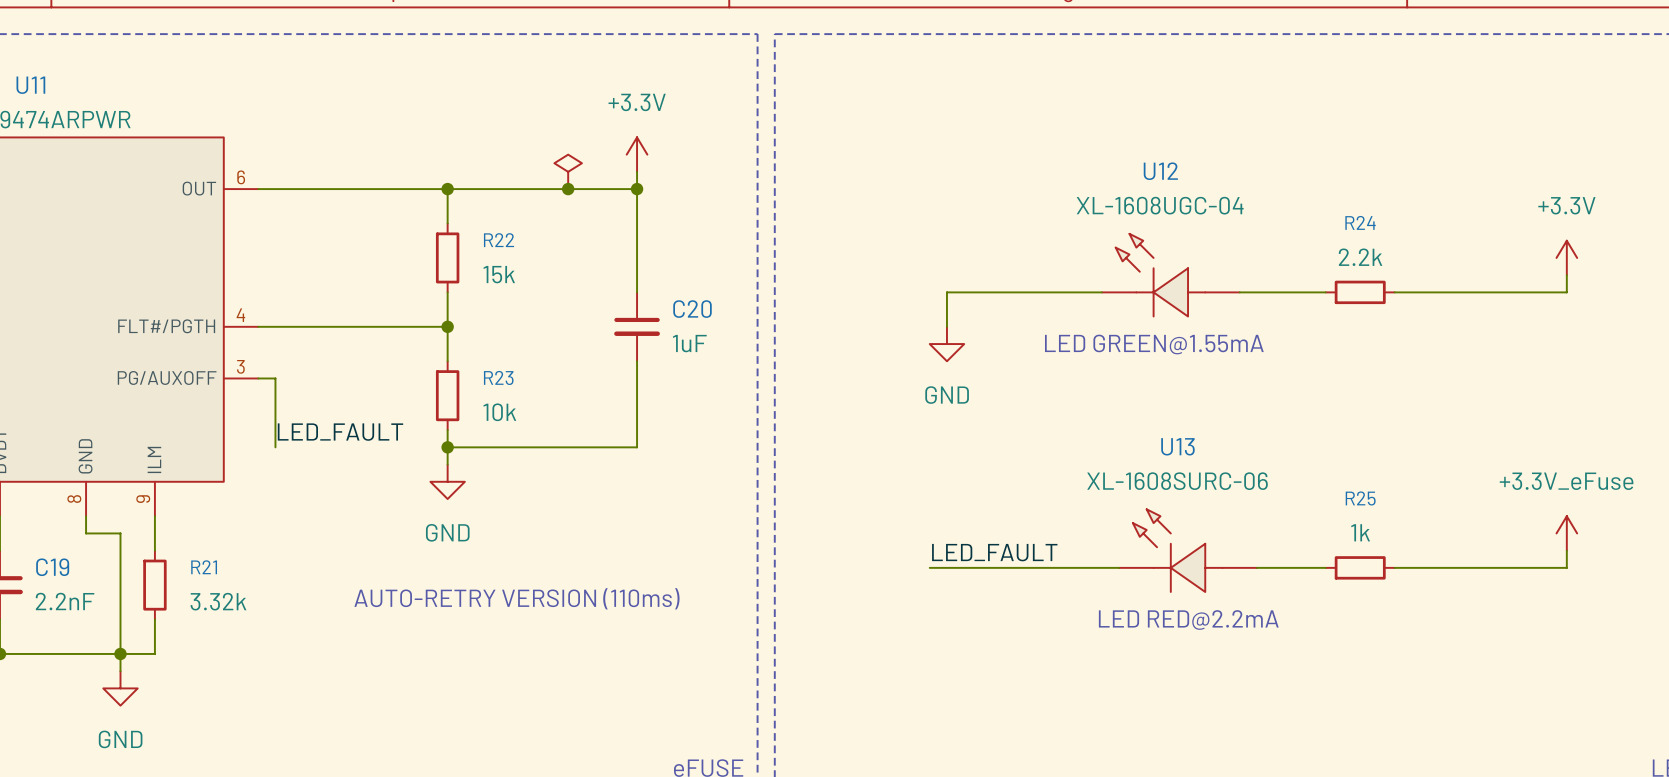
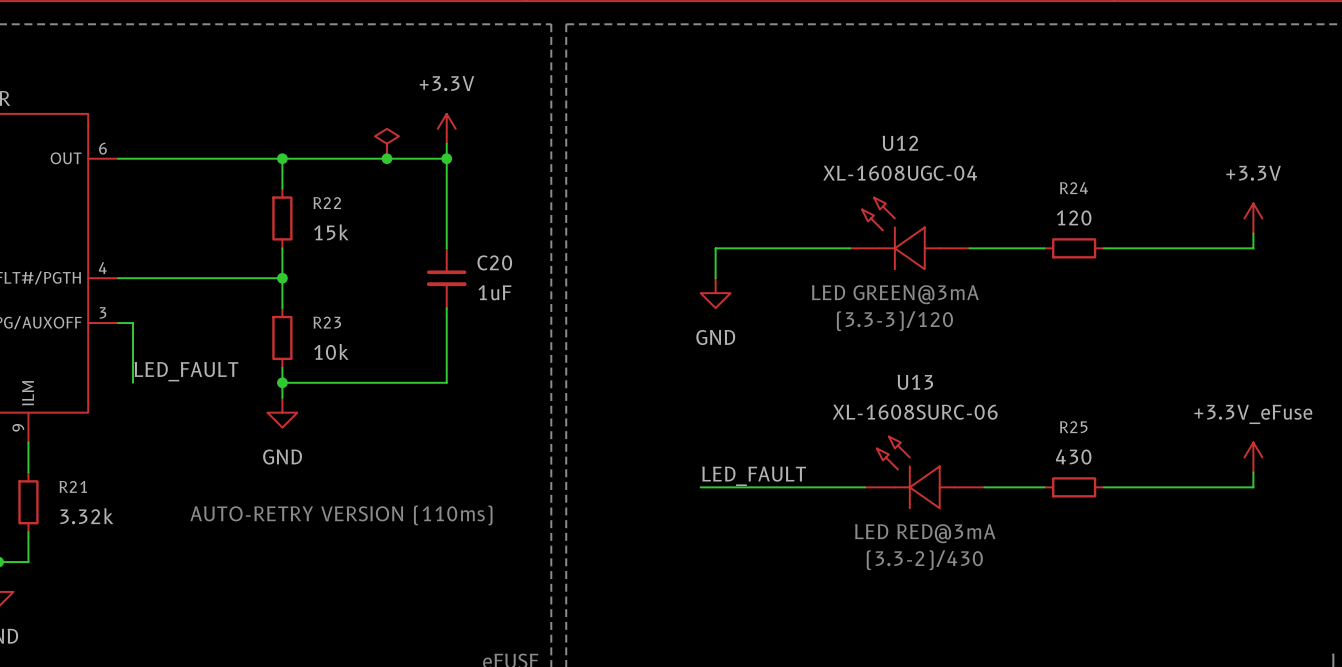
R24 value: 2.2k (1360, 257) -> 120 (1074, 217)
text: LED GREEN@1.55mA (1154, 344) -> LED GREEN@3mA (895, 294)
text: none -> (3.3-3)/120 (894, 321)
R25 value: 1k (1360, 532) -> 430 (1073, 457)
text: LED RED@2.2mA (1188, 619) -> LED RED@3mA (925, 533)
text: none -> (3.3-2)/430 (924, 560)

